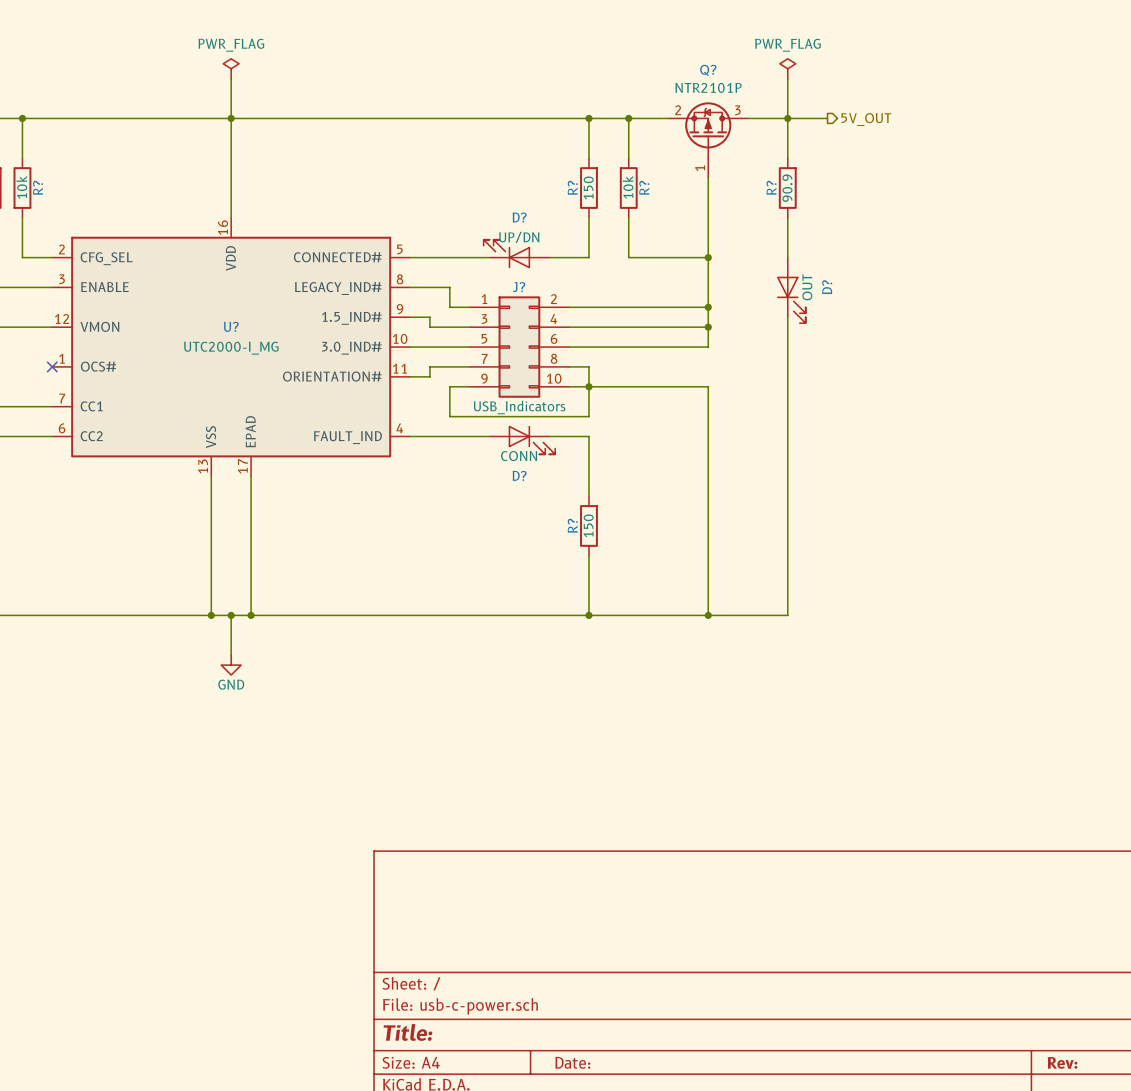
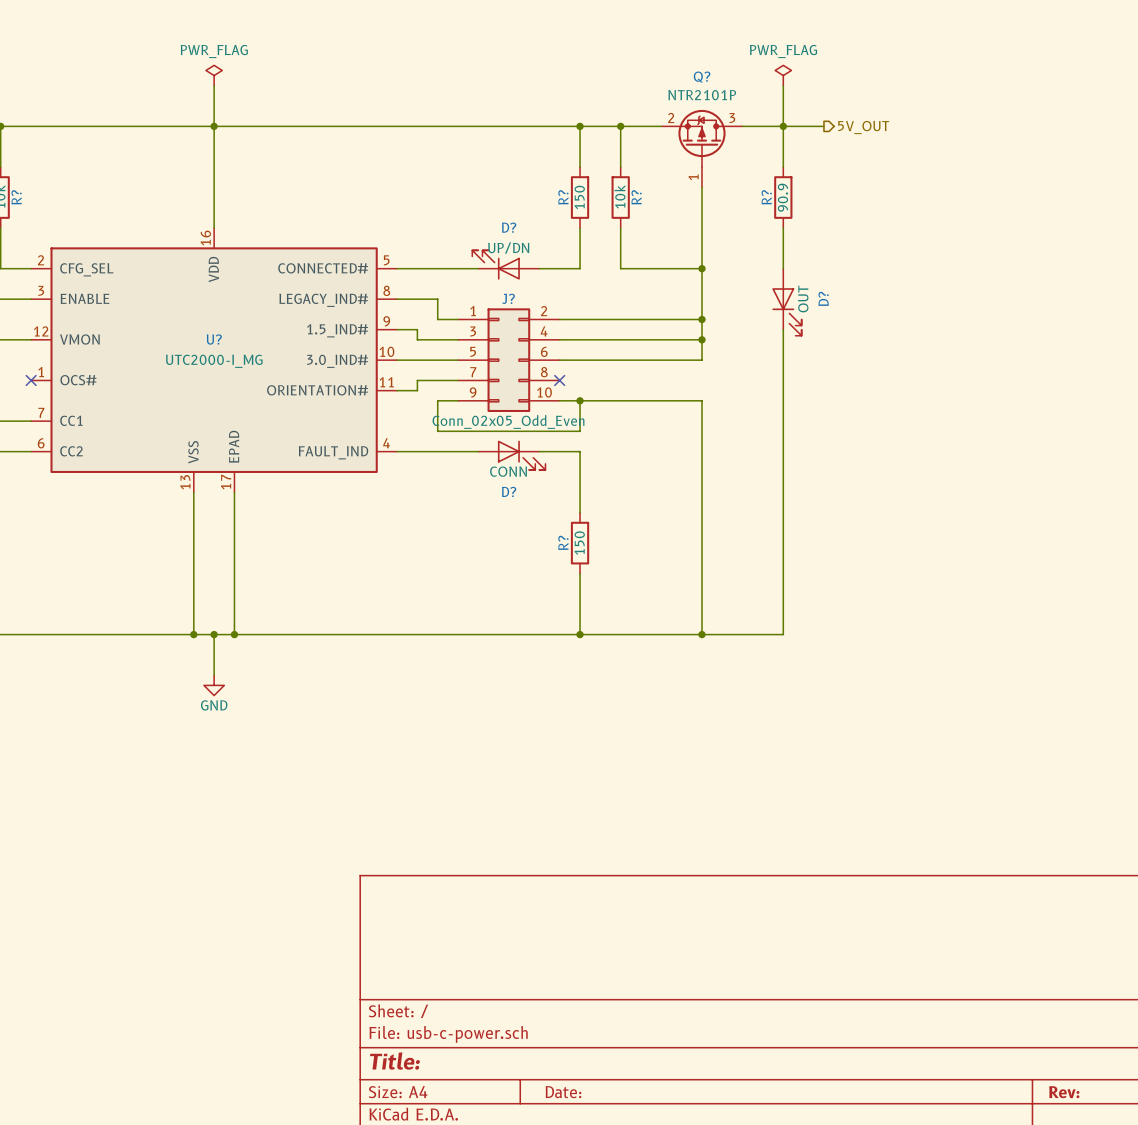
wire: (569, 366) (588, 366) (588, 386) -> none
no-connect mark: none -> (559, 380)
J? value: USB_Indicators (519, 407) -> Conn_02x05_Odd_Even (508, 421)

